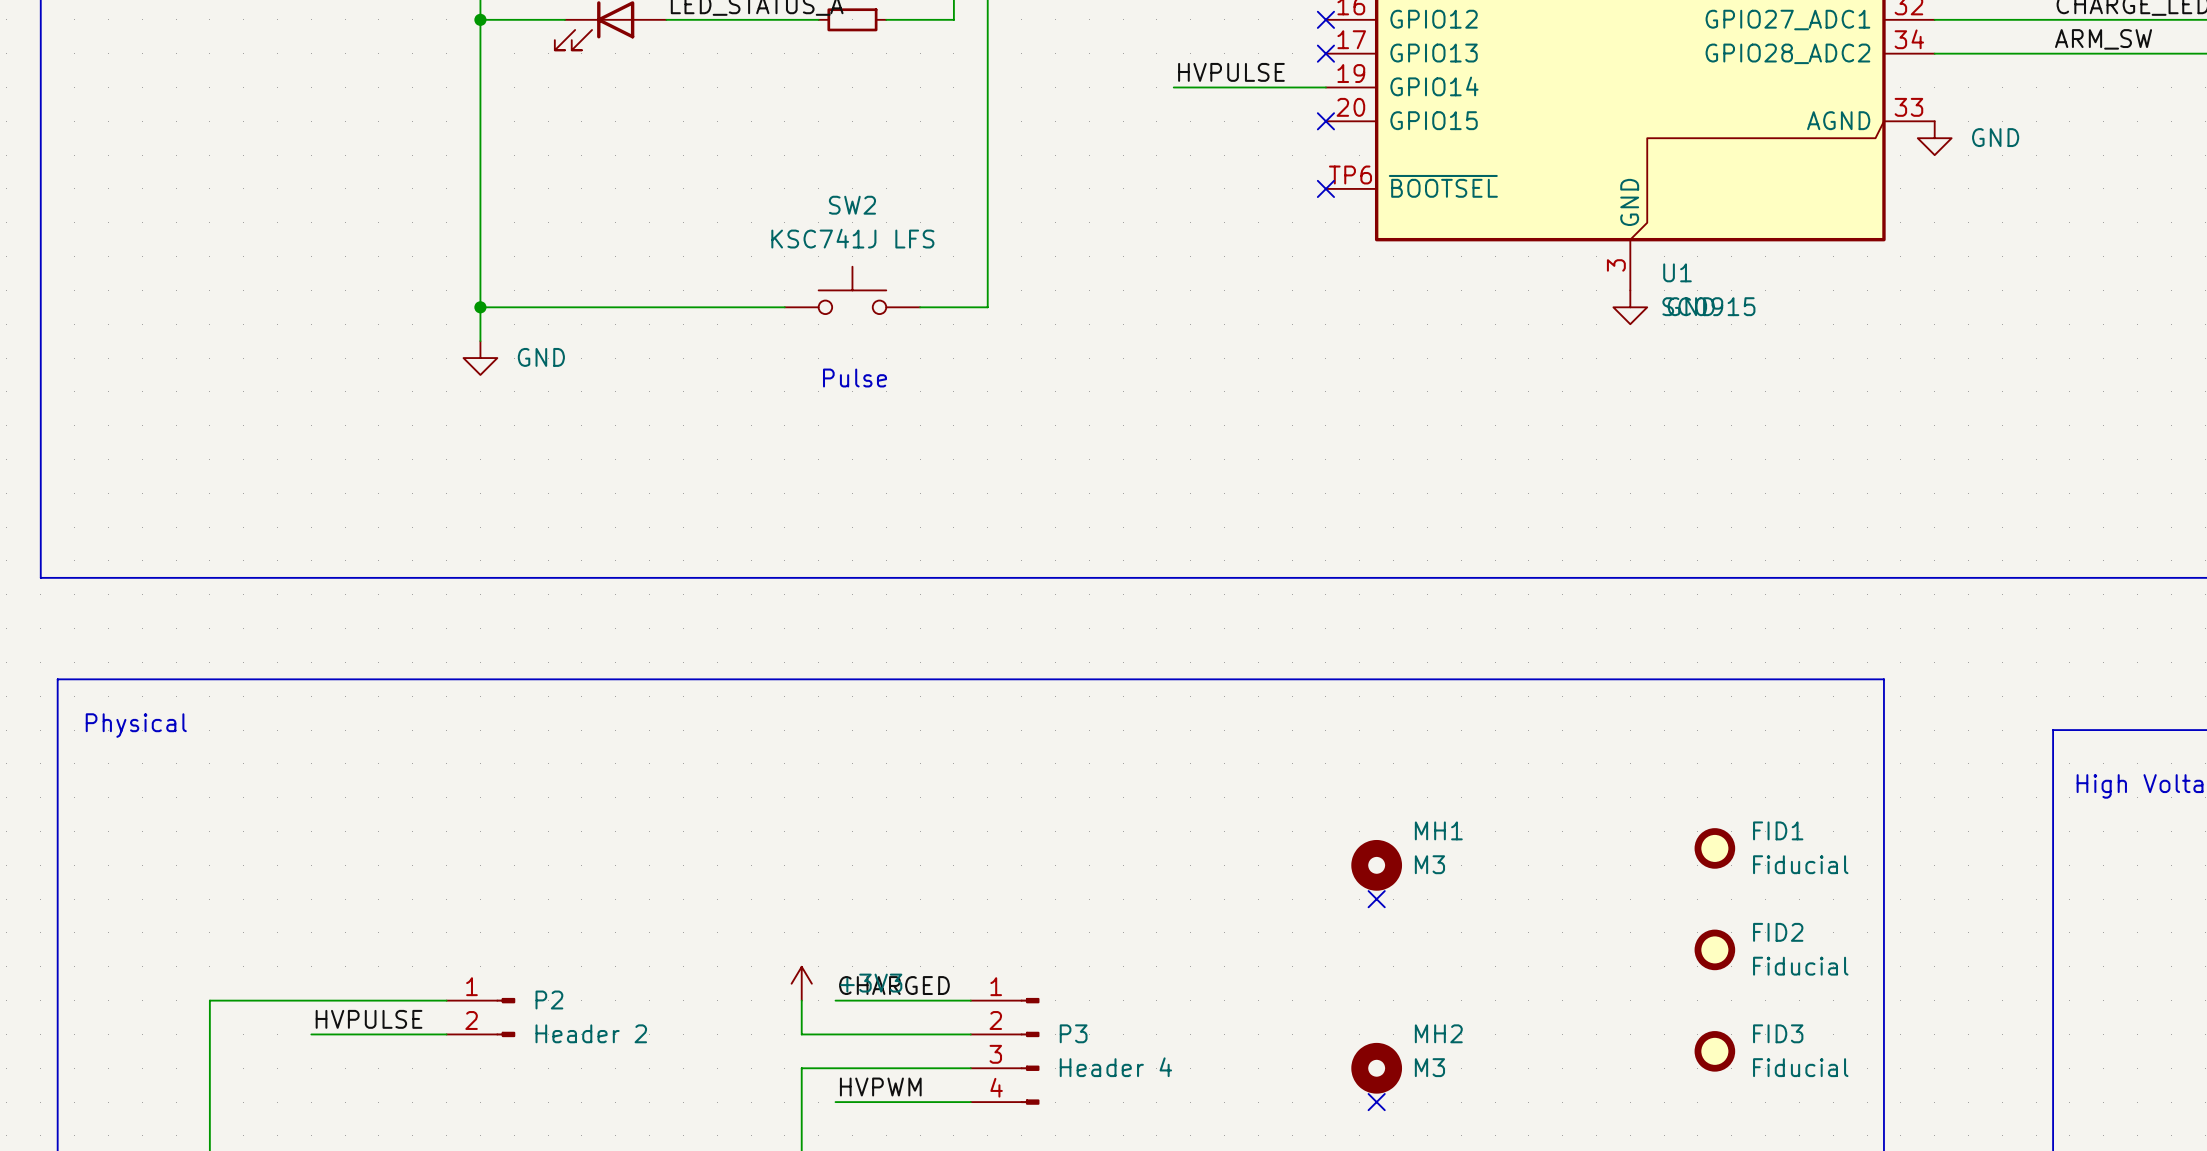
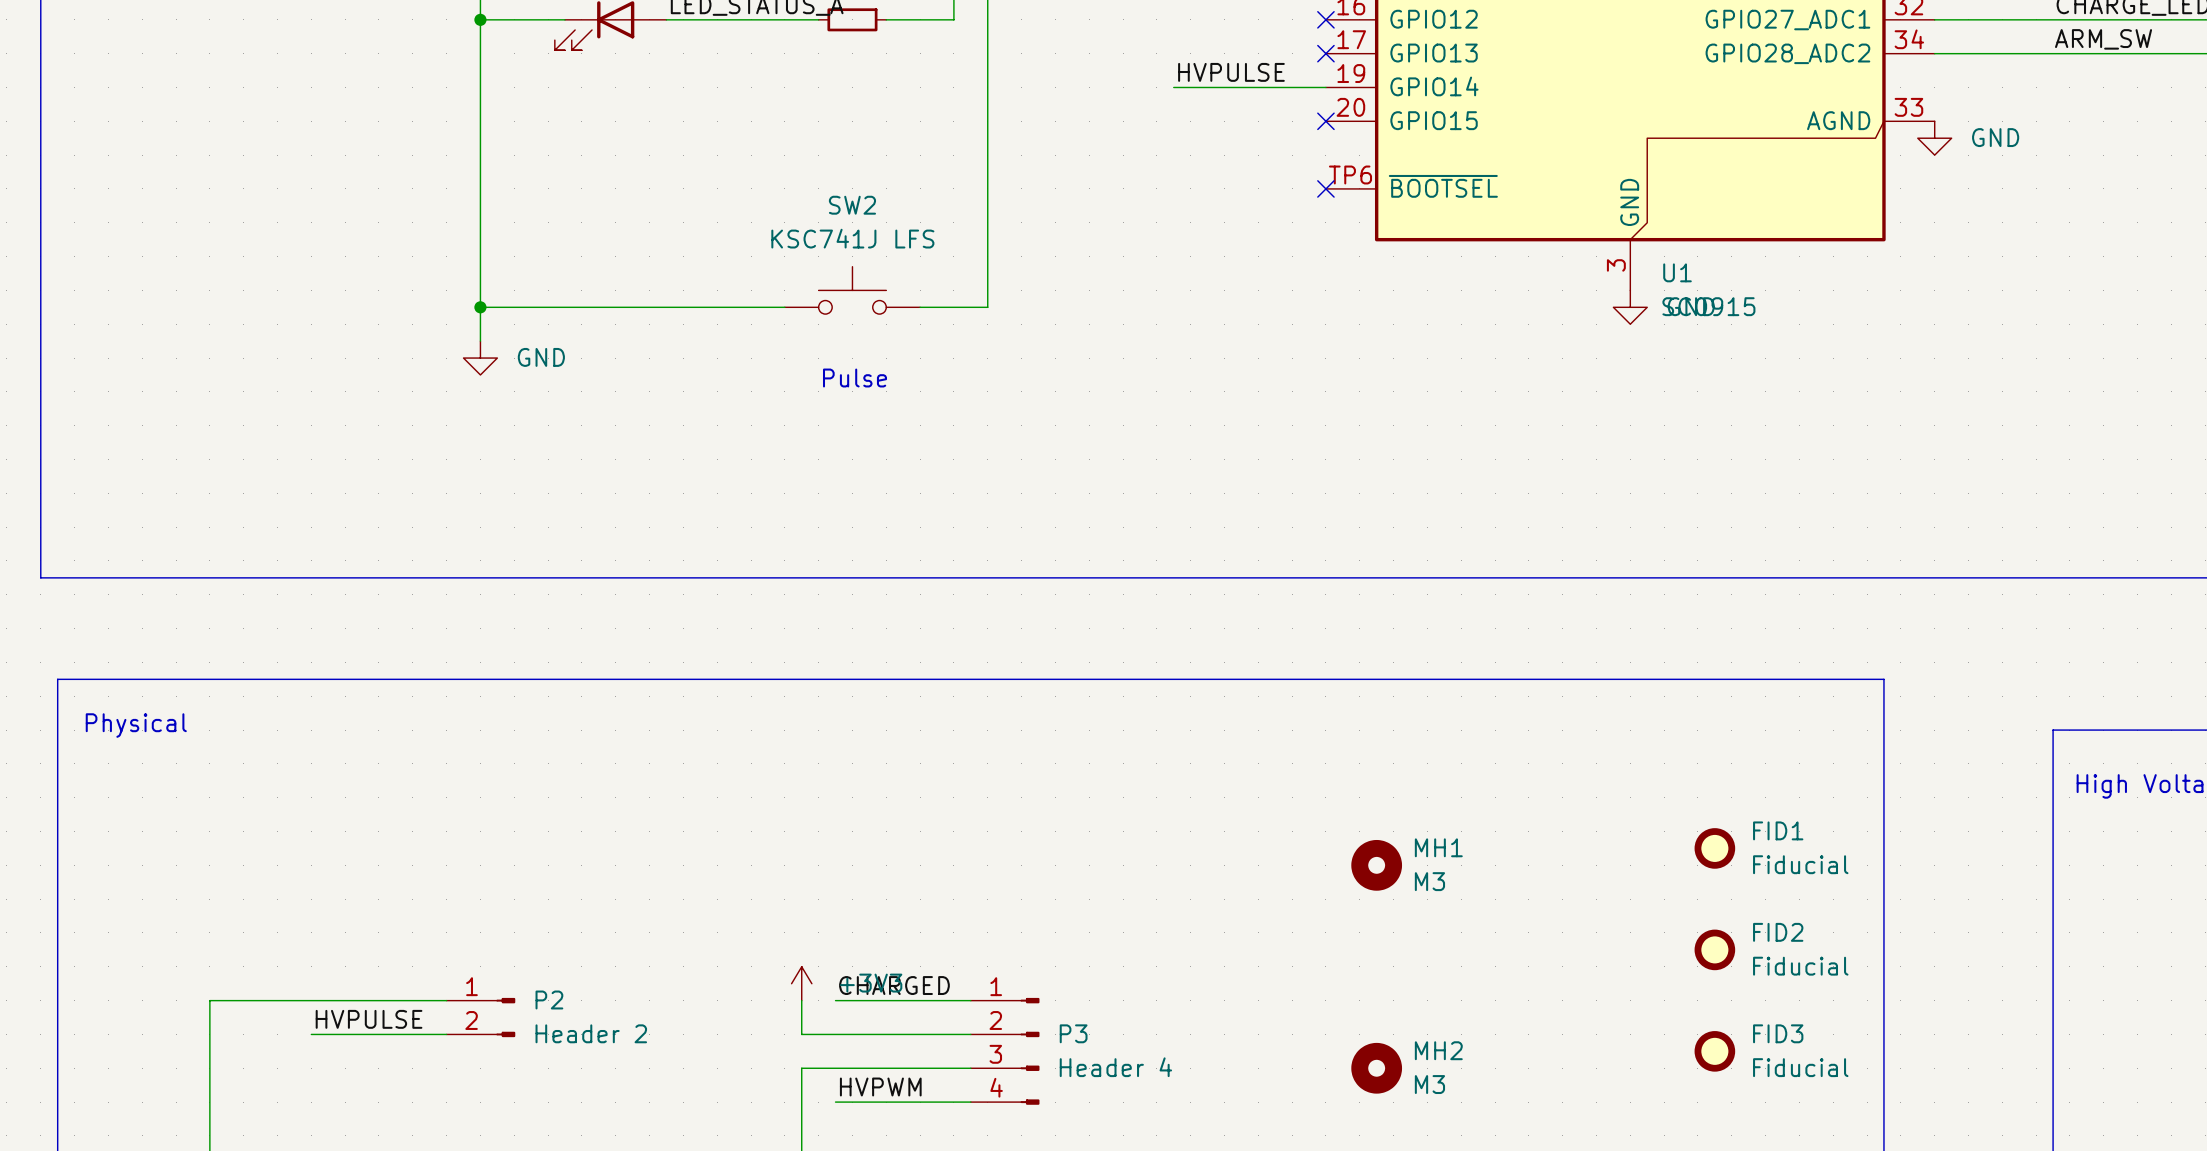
MH1 name position: MH1 (1438, 830) -> MH1 (1438, 847)
MH1 value position: M3 (1429, 864) -> M3 (1429, 881)
no-connect mark: (1376, 899) -> none
MH2 name position: MH2 (1438, 1033) -> MH2 (1438, 1050)
MH2 value position: M3 (1429, 1067) -> M3 (1429, 1084)
no-connect mark: (1376, 1102) -> none

